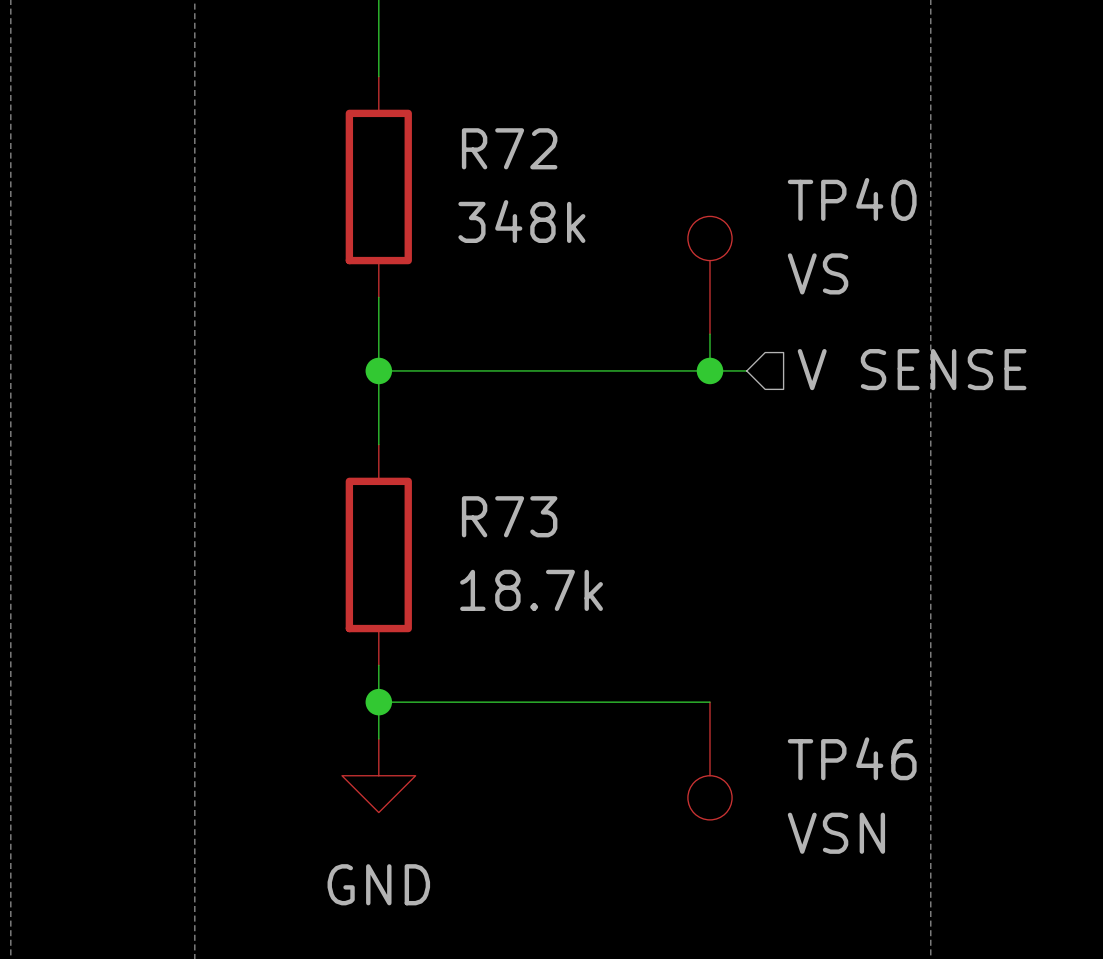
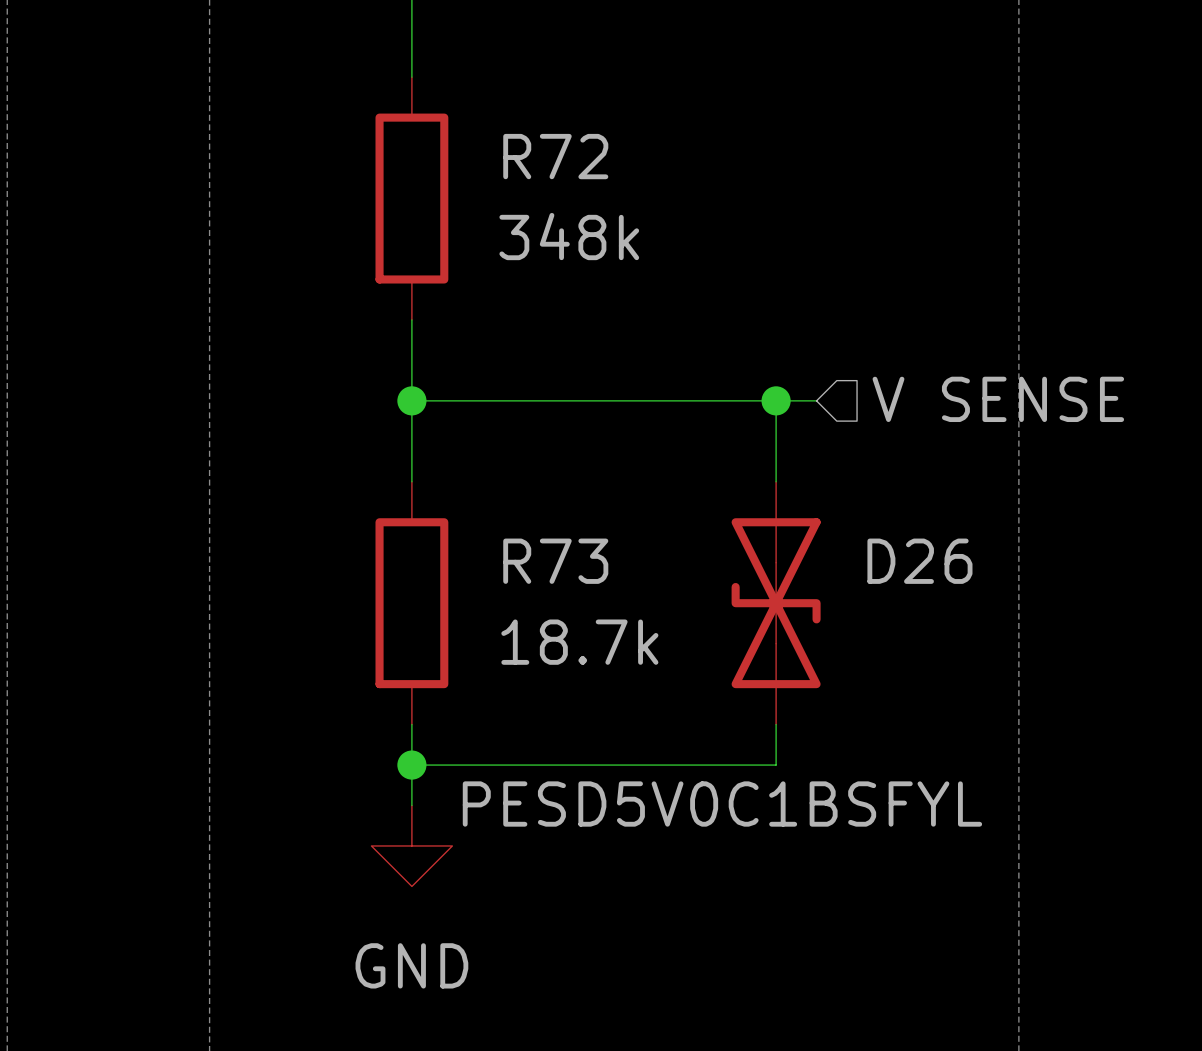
TP40: VS (709, 275) -> none
wire: (709, 334) (709, 370) -> (776, 481) (776, 400)
D26: none -> PESD5V0C1BSFYL (776, 603)
wire: none -> (776, 724) (776, 765)
TP46: VSN (709, 761) -> none

